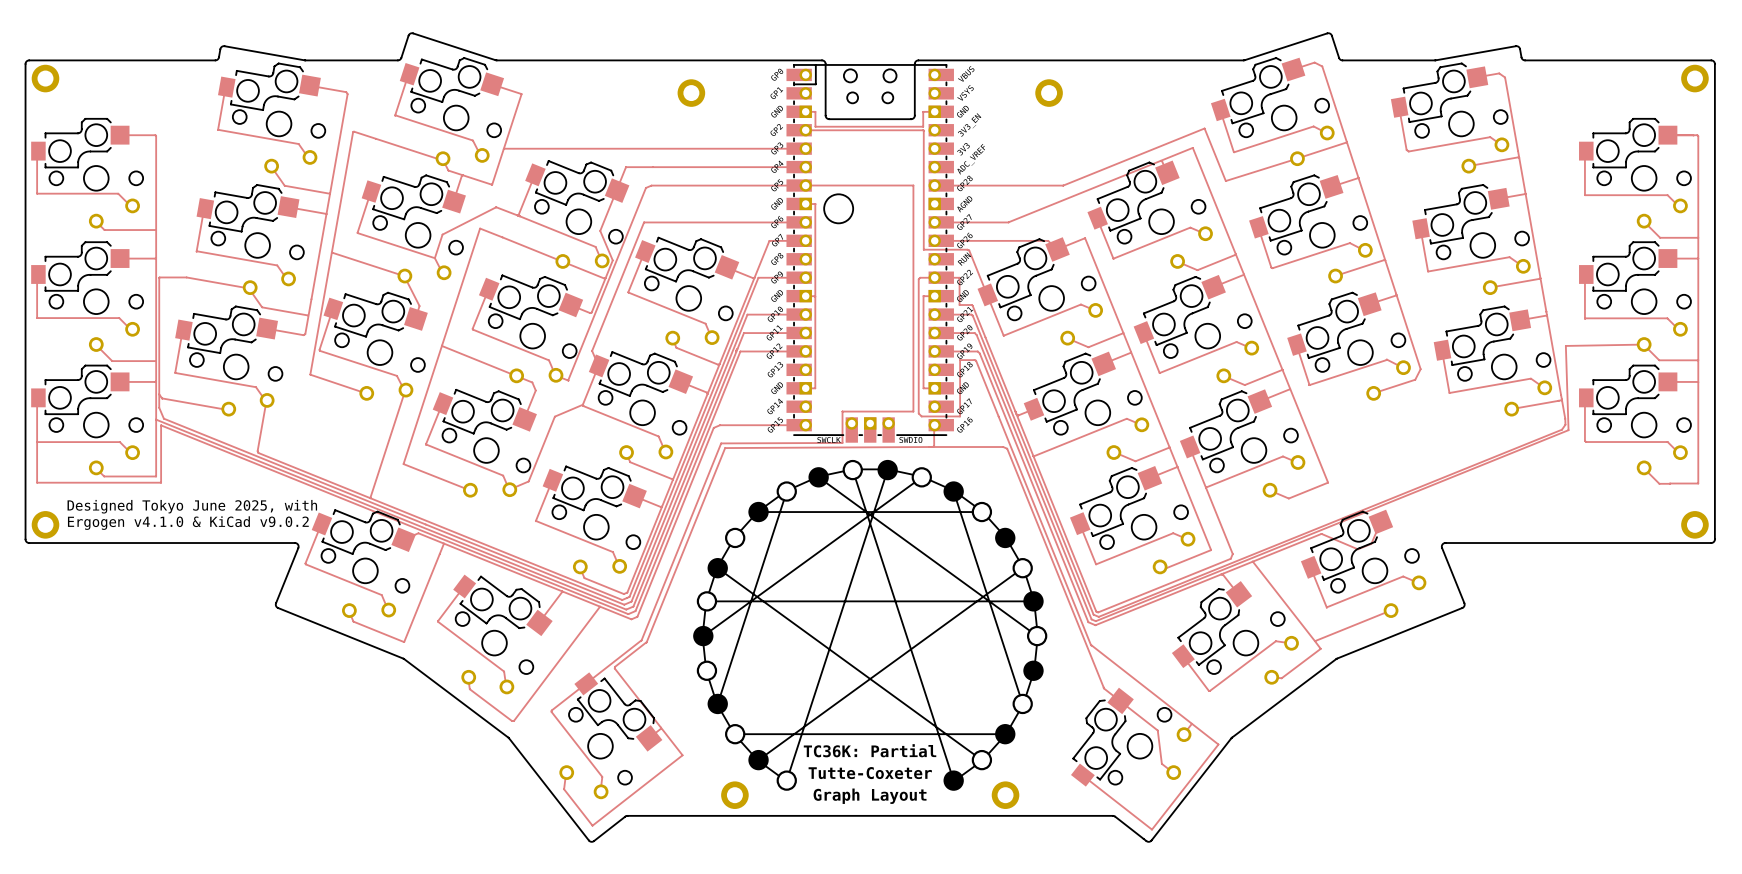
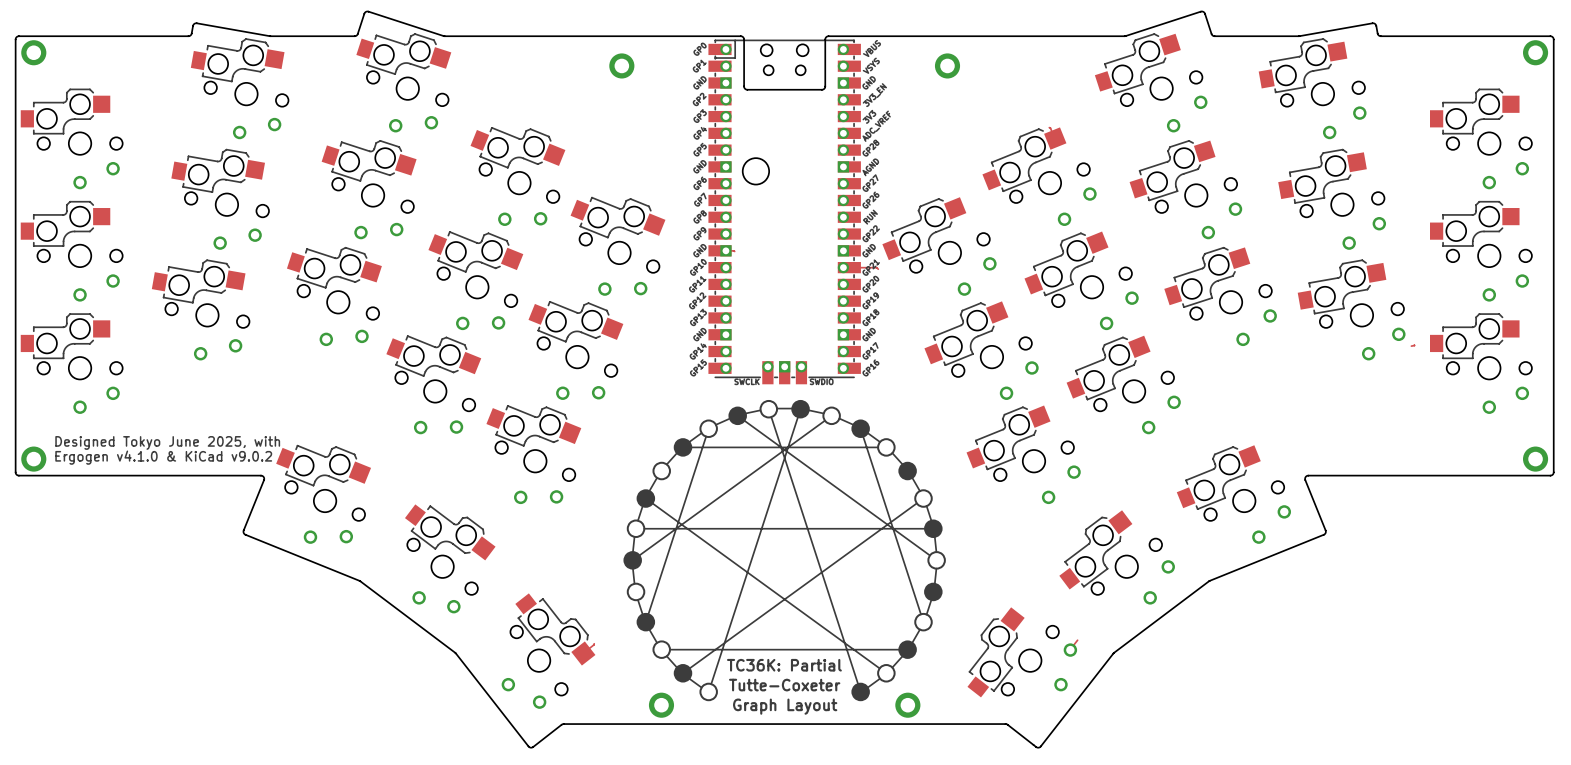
track: (1292, 69) (1314, 62) (1322, 66) (1396, 293) -> none
track: (408, 75) (395, 115) (472, 140) (480, 156) -> none
track: (1476, 77) (1499, 73) (1505, 77) (1546, 315) (1519, 320) -> none
track: (491, 84) (521, 94) (492, 184) (448, 170) (442, 158) -> none
track: (309, 85) (346, 92) (347, 94) (305, 334) (266, 328) -> none
track: (225, 87) (218, 129) (298, 144) (308, 158) -> none
track: (1399, 107) (1406, 150) (1408, 151) (1490, 137) (1501, 144) -> none
track: (1220, 110) (1234, 152) (1313, 126) (1326, 133) -> none
track: (805, 111) (815, 111) (815, 126) (923, 126) (923, 111) (934, 111) -> none
track: (805, 130) (923, 130) -> none
track: (923, 130) (923, 249) (969, 250) (1003, 335) (1080, 304) (1095, 310) -> none
track: (119, 135) (156, 135) (156, 476) (104, 476) (95, 467) -> none
track: (1667, 135) (1698, 136) (1698, 483) (1659, 483) (1643, 467) -> none
track: (1346, 142) (1297, 158) -> none
track: (805, 148) (503, 149) -> none
track: (37, 151) (37, 193) (118, 193) (131, 206) -> none
track: (1584, 151) (1584, 195) (1667, 195) (1679, 206) -> none
track: (1519, 157) (1468, 166) -> none
track: (1296, 158) (1225, 181) (1204, 128) (1063, 185) (934, 185) -> none
track: (442, 160) (353, 132) (310, 374) (366, 393) -> none
track: (271, 166) (284, 185) (330, 193) -> none
track: (626, 167) (805, 167) -> none
track: (626, 167) (600, 230) (612, 260) (591, 312) (570, 305) -> none
track: (534, 174) (517, 215) (595, 246) (601, 260) -> none
track: (462, 175) (453, 201) -> none
track: (1358, 178) (1331, 186) -> none
track: (805, 185) (913, 185) (913, 411) (842, 411) (842, 442) (721, 443) (641, 640) (551, 710) (602, 776) (600, 791) -> none
track: (805, 185) (651, 185) (645, 187) (568, 380) (555, 375) (549, 360) (472, 329) (488, 289) -> none
track: (370, 193) (357, 233) (434, 258) -> none
track: (1525, 193) (1498, 198) -> none
track: (805, 204) (815, 204) (815, 388) (805, 388) -> none
track: (287, 207) (326, 214) -> none
track: (204, 209) (196, 251) (277, 265) (287, 279) -> none
track: (519, 216) (495, 207) (442, 234) (434, 258) -> none
track: (1097, 218) (1113, 258) (1190, 227) (1204, 233) -> none
track: (95, 221) (104, 230) (156, 230) -> none
track: (1643, 221) (1660, 237) (1698, 237) -> none
track: (805, 222) (644, 222) (592, 350) (598, 365) (582, 404) -> none
track: (934, 222) (1008, 222) (1192, 147) (1235, 254) -> none
track: (1258, 227) (1272, 268) (1349, 243) (1364, 250) -> none
track: (1420, 228) (1428, 271) (1509, 257) (1522, 266) -> none
track: (805, 240) (769, 240) (627, 592) (623, 594) (584, 578) (579, 566) -> none
track: (934, 240) (1048, 240) (1056, 249) (1085, 238) (1210, 549) (1164, 569) (1159, 566) -> none
track: (644, 251) (628, 292) (705, 323) (711, 337) -> none
track: (331, 252) (404, 276) (419, 306) (415, 319) -> none
track: (1235, 254) (1197, 270) (1177, 261) -> none
track: (1235, 254) (1282, 369) -> none
track: (156, 257) (119, 258) -> none
track: (434, 258) (443, 274) -> none
track: (1667, 258) (1698, 258) -> none
track: (1385, 260) (1335, 276) -> none
track: (726, 267) (754, 277) -> none
track: (1244, 274) (1213, 287) -> none
track: (37, 275) (37, 318) (119, 318) (131, 330) -> none
track: (1584, 275) (1584, 318) (1667, 318) (1679, 330) -> none
track: (605, 277) (480, 228) (403, 464) (469, 490) -> none
track: (805, 277) (758, 277) (629, 596) (622, 599) (258, 452) (266, 400) -> none
track: (1540, 278) (1489, 287) -> none
track: (1396, 293) (1420, 369) (1415, 379) (1373, 393) -> none
track: (1396, 295) (1369, 304) -> none
track: (934, 296) (923, 295) (923, 388) (934, 388) -> none
track: (332, 310) (319, 350) (396, 375) (404, 391) -> none
track: (805, 314) (747, 314) (631, 601) (624, 604) (163, 418) (159, 407) (159, 277) (186, 277) (248, 288) (262, 307) (307, 315) -> none
track: (972, 315) (1093, 614) (1098, 616) (1561, 429) (1565, 424) (1565, 418) (1547, 316) -> none
track: (182, 330) (175, 372) (256, 387) (265, 401) -> none
track: (1123, 332) (1088, 347) (1067, 338) -> none
track: (1143, 332) (1159, 373) (1236, 341) (1251, 348) -> none
track: (805, 333) (743, 333) (633, 606) (626, 609) (156, 419) -> none
track: (934, 333) (974, 333) (976, 335) (1091, 619) (1095, 621) (1568, 430) (1565, 345) (1643, 344) (1659, 360) (1698, 360) -> none
track: (672, 338) (676, 347) (719, 364) -> none
track: (95, 344) (112, 361) (156, 360) -> none
track: (1296, 344) (1309, 385) (1386, 359) (1402, 367) -> none
track: (442, 345) (532, 382) (535, 390) (524, 419) -> none
track: (1441, 350) (1449, 393) (1530, 378) (1544, 387) -> none
track: (805, 351) (740, 351) (635, 611) (628, 614) (161, 425) -> none
track: (934, 351) (977, 351) (979, 353) (1088, 622) (1095, 625) (1321, 533) (1357, 549) (1371, 543) (1380, 522) -> none
track: (1131, 352) (1103, 363) -> none
track: (1282, 369) (1244, 385) (1223, 375) -> none
track: (1282, 369) (1290, 388) -> none
track: (156, 381) (119, 381) -> none
track: (680, 381) (707, 393) -> none
track: (1667, 381) (1698, 382) -> none
track: (1290, 388) (1328, 482) (1288, 498) (1269, 490) -> none
track: (1290, 388) (1259, 401) -> none
track: (405, 390) (370, 498) -> none
track: (159, 394) (162, 398) -> none
track: (37, 398) (37, 442) -> none
track: (162, 398) (227, 409) -> none
track: (1584, 398) (1586, 442) (1667, 442) (1679, 453) -> none
track: (1558, 400) (1511, 409) -> none
track: (442, 403) (425, 444) (503, 475) (509, 489) (528, 481) (554, 416) (582, 404) -> none
track: (583, 406) (658, 436) (665, 452) -> none
track: (1033, 409) (1016, 414) -> none
track: (1141, 424) (1126, 418) (1033, 456) -> none
track: (161, 425) (161, 482) (37, 482) (37, 442) -> none
track: (805, 425) (720, 425) (713, 427) (637, 616) (631, 619) (418, 533) (403, 539) -> none
track: (934, 425) (933, 447) -> none
track: (37, 442) (119, 442) (131, 453) -> none
track: (1169, 447) (1135, 461) (1114, 452) -> none
track: (1189, 447) (1232, 554) (1230, 558) (1096, 611) (972, 305) (959, 305) (959, 277) (918, 279) (918, 413) (921, 416) (960, 416) (960, 360) (976, 360) (1091, 645) (1218, 744) (1152, 829) (1082, 775) -> none
track: (626, 452) (630, 462) (673, 479) -> none
track: (1297, 462) (1282, 456) (1205, 487) -> none
track: (1177, 467) (1149, 478) -> none
track: (552, 480) (535, 521) (613, 552) (619, 566) -> none
track: (633, 496) (662, 506) -> none
track: (1079, 523) (1096, 564) (1173, 533) (1187, 539) -> none
track: (321, 524) (305, 564) (381, 595) (388, 610) -> none
track: (443, 543) (404, 641) (353, 621) (348, 610) -> none
track: (1252, 561) (1320, 648) (1281, 678) (1271, 676) -> none
track: (1310, 567) (1326, 607) (1403, 576) (1418, 582) -> none
track: (1221, 574) (1238, 594) -> none
track: (464, 586) (438, 621) (504, 671) (506, 687) -> none
track: (562, 591) (538, 622) -> none
track: (600, 606) (514, 720) (469, 689) (468, 677) -> none
track: (1390, 610) (1315, 641) -> none
track: (1290, 643) (1275, 641) (1209, 691) (1182, 656) -> none
track: (566, 772) (564, 789) (592, 825) (682, 755) (614, 666) (646, 642) (725, 448) (1003, 447) (1007, 448) (1103, 688) (1157, 730) (1161, 763) (1173, 772) -> none

